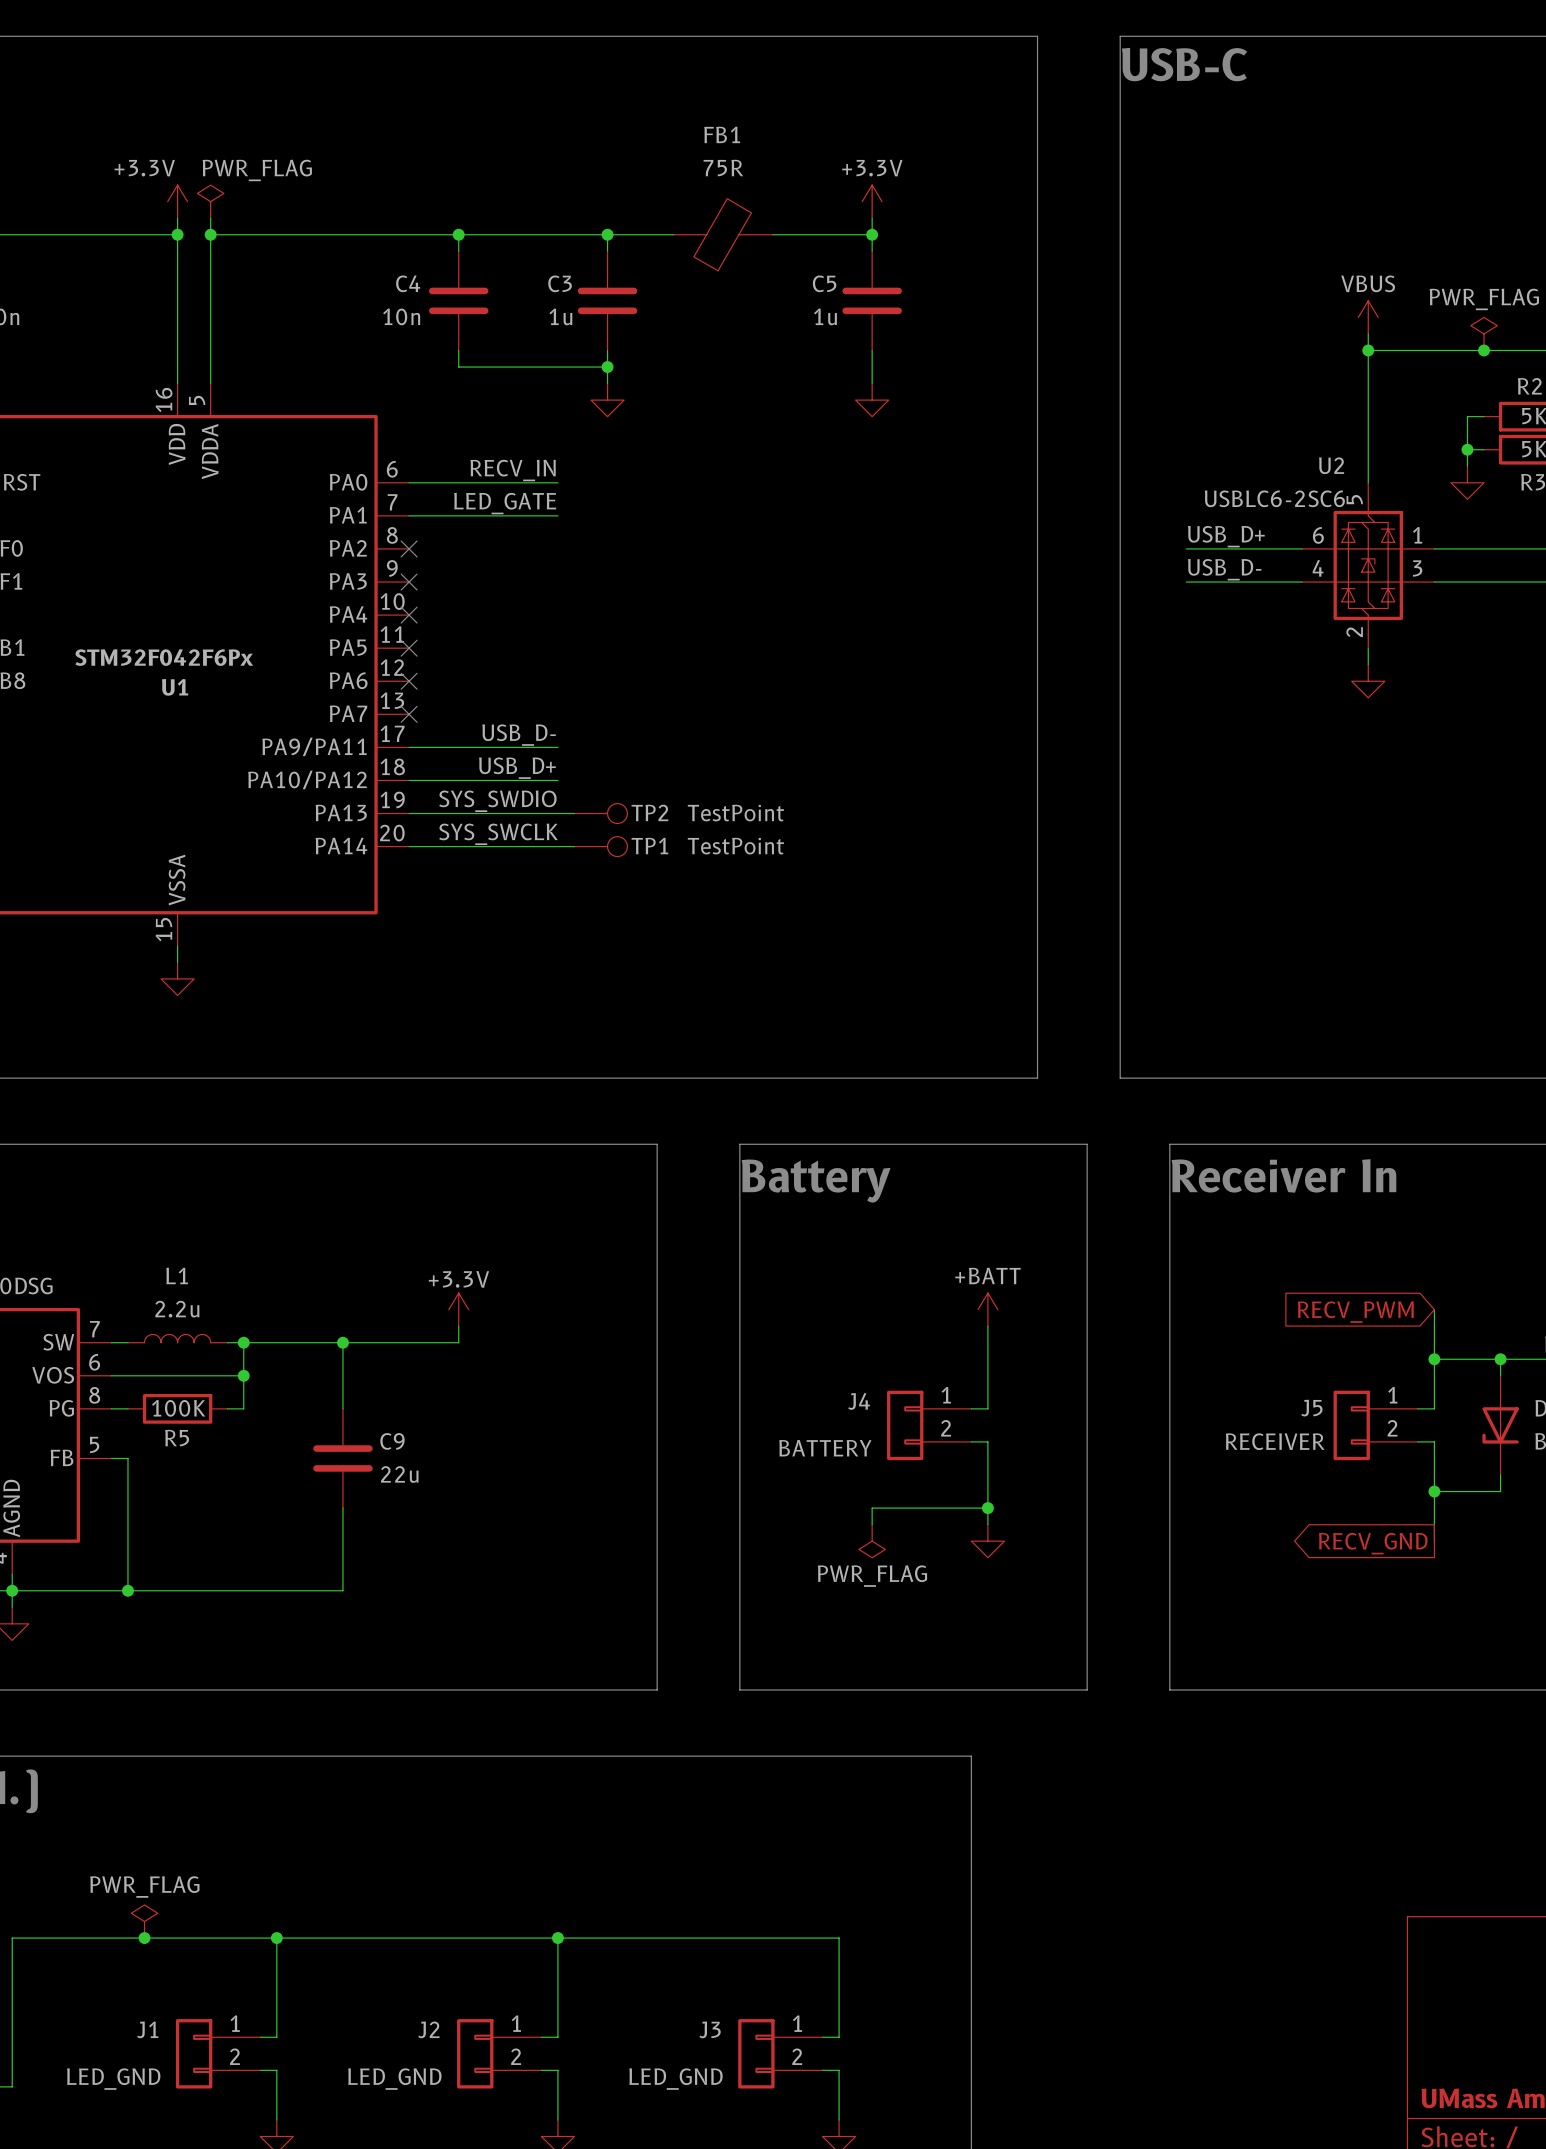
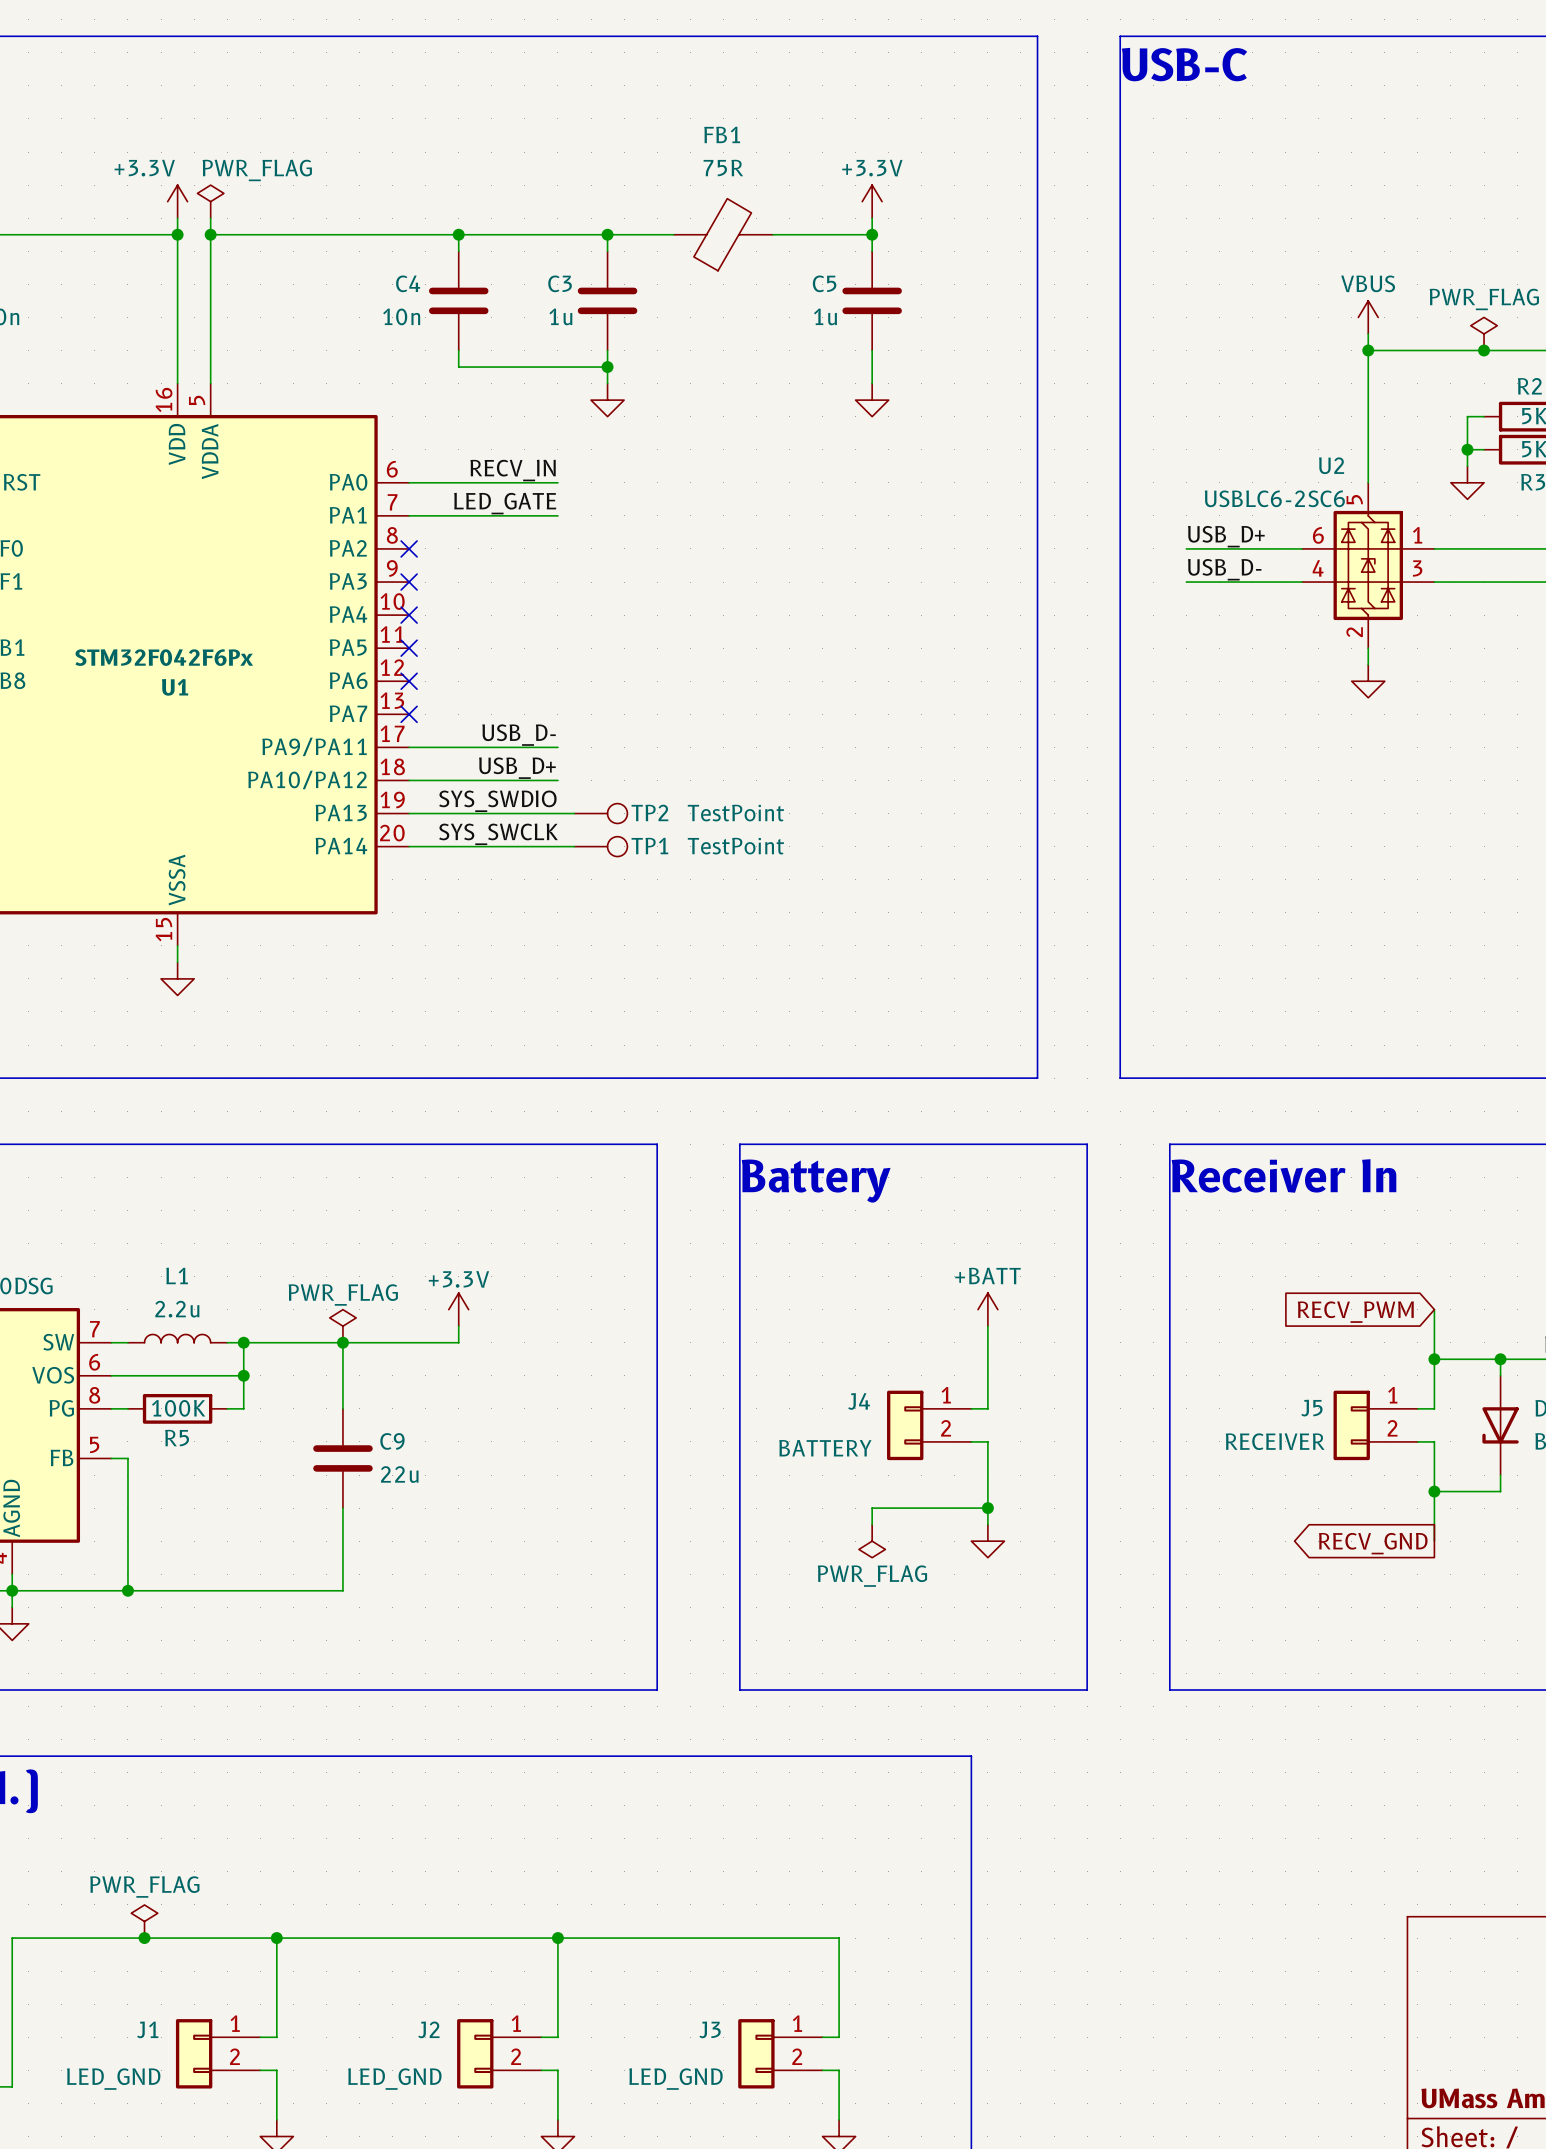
power symbol: none -> PWR_FLAG (342, 1326)

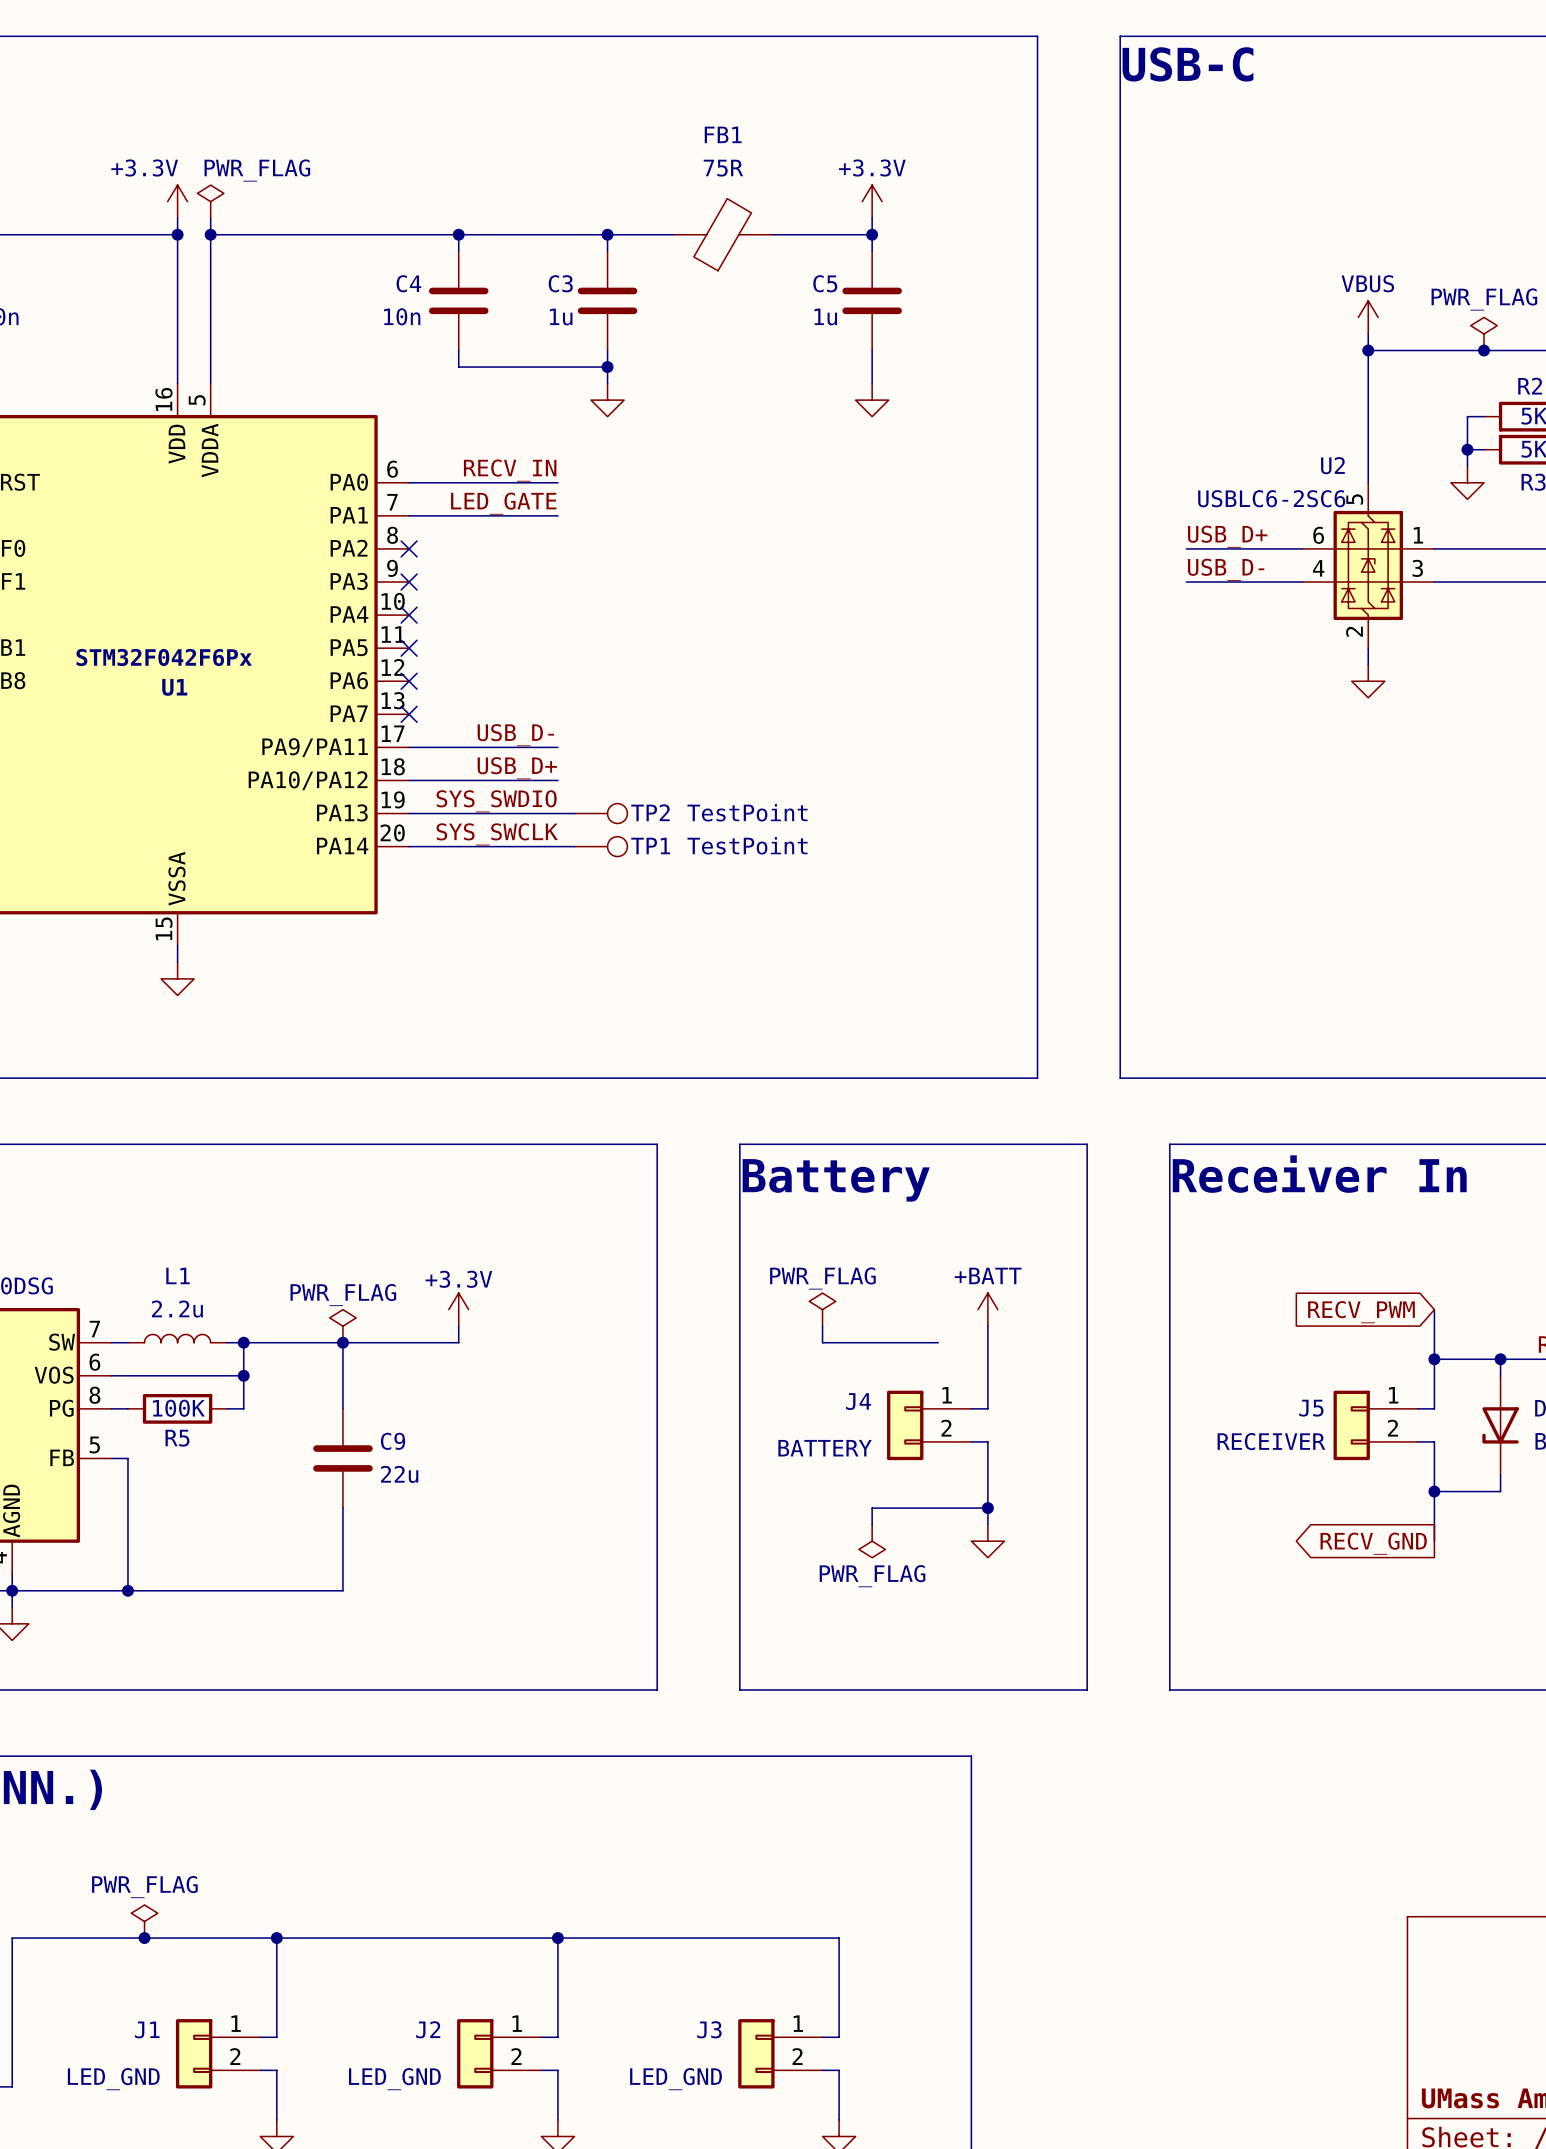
power symbol: none -> PWR_FLAG (822, 1309)
wire: none -> (822, 1326) (822, 1342) (938, 1342)

